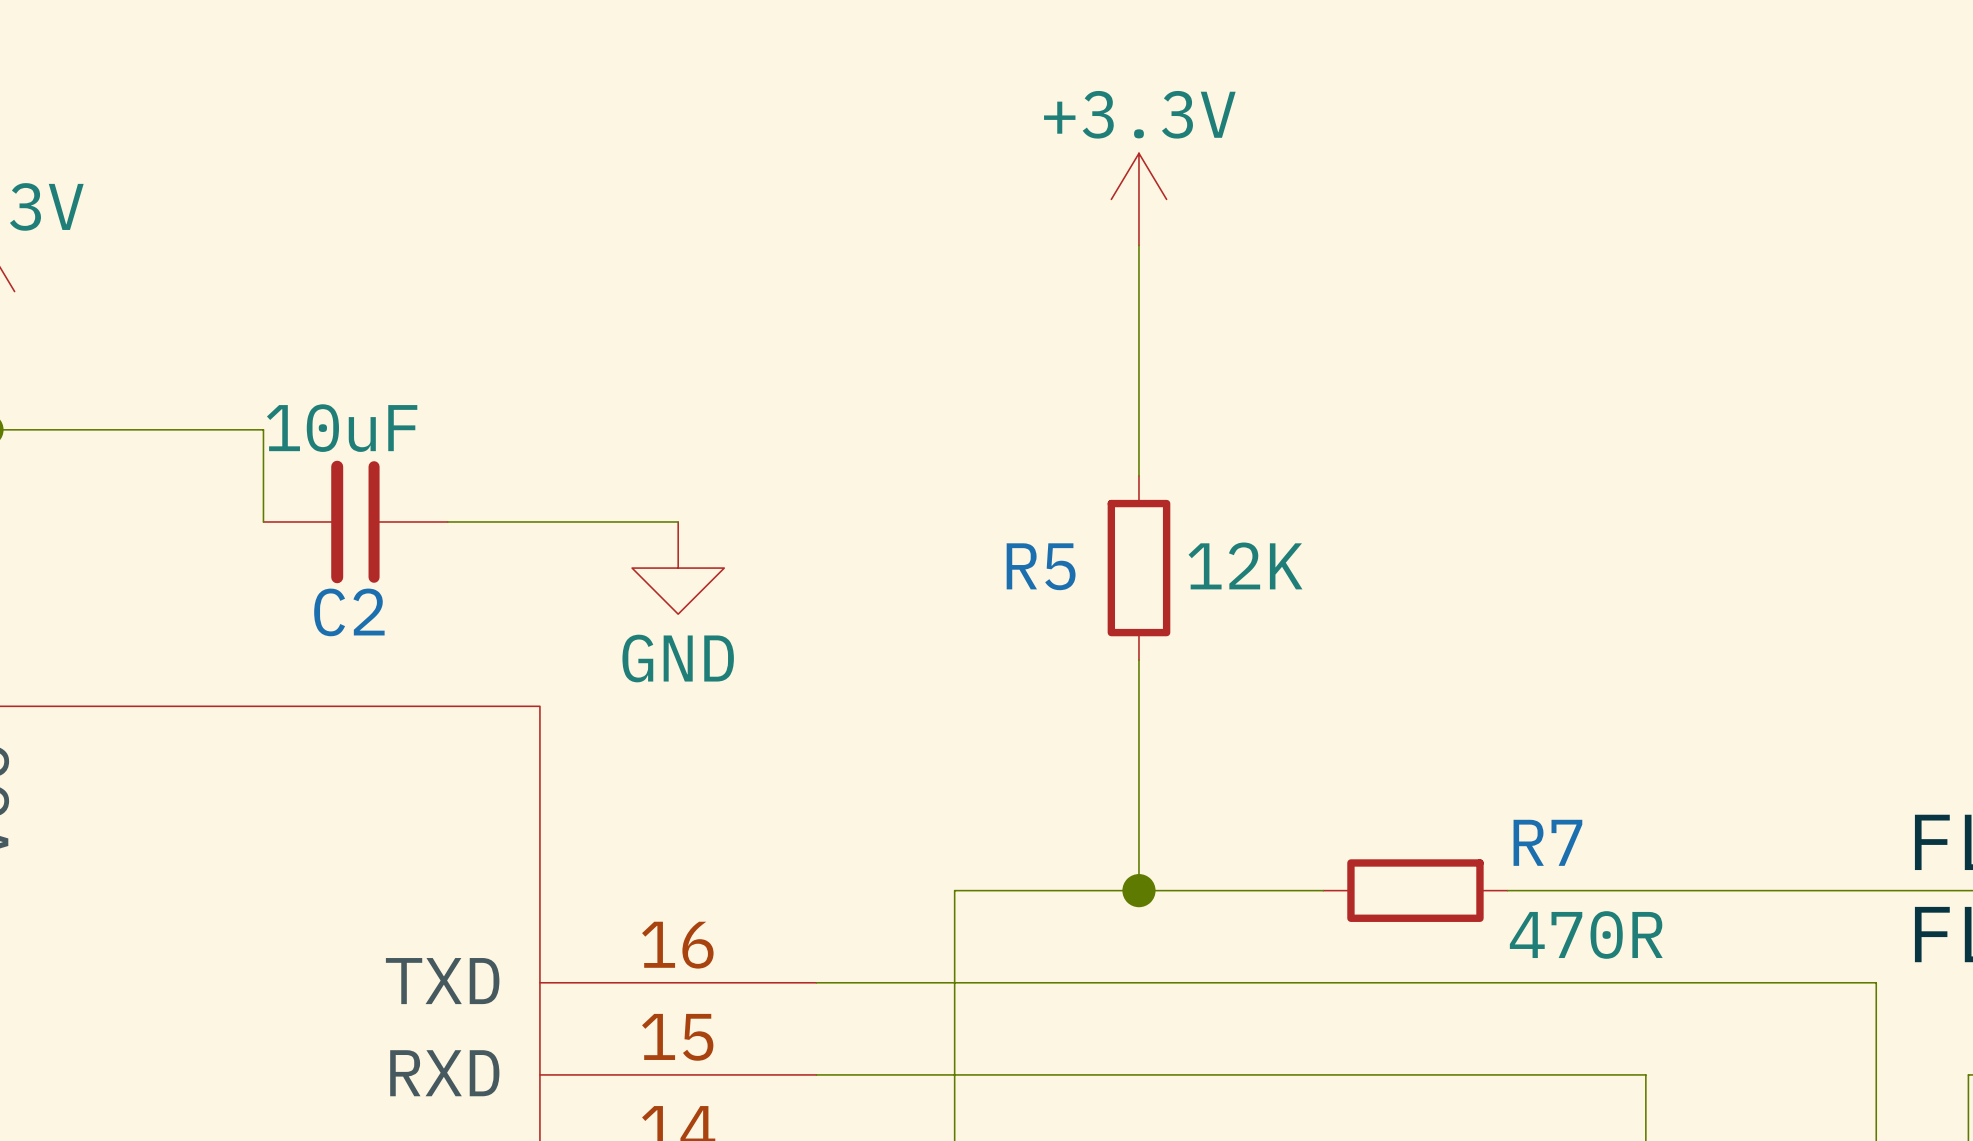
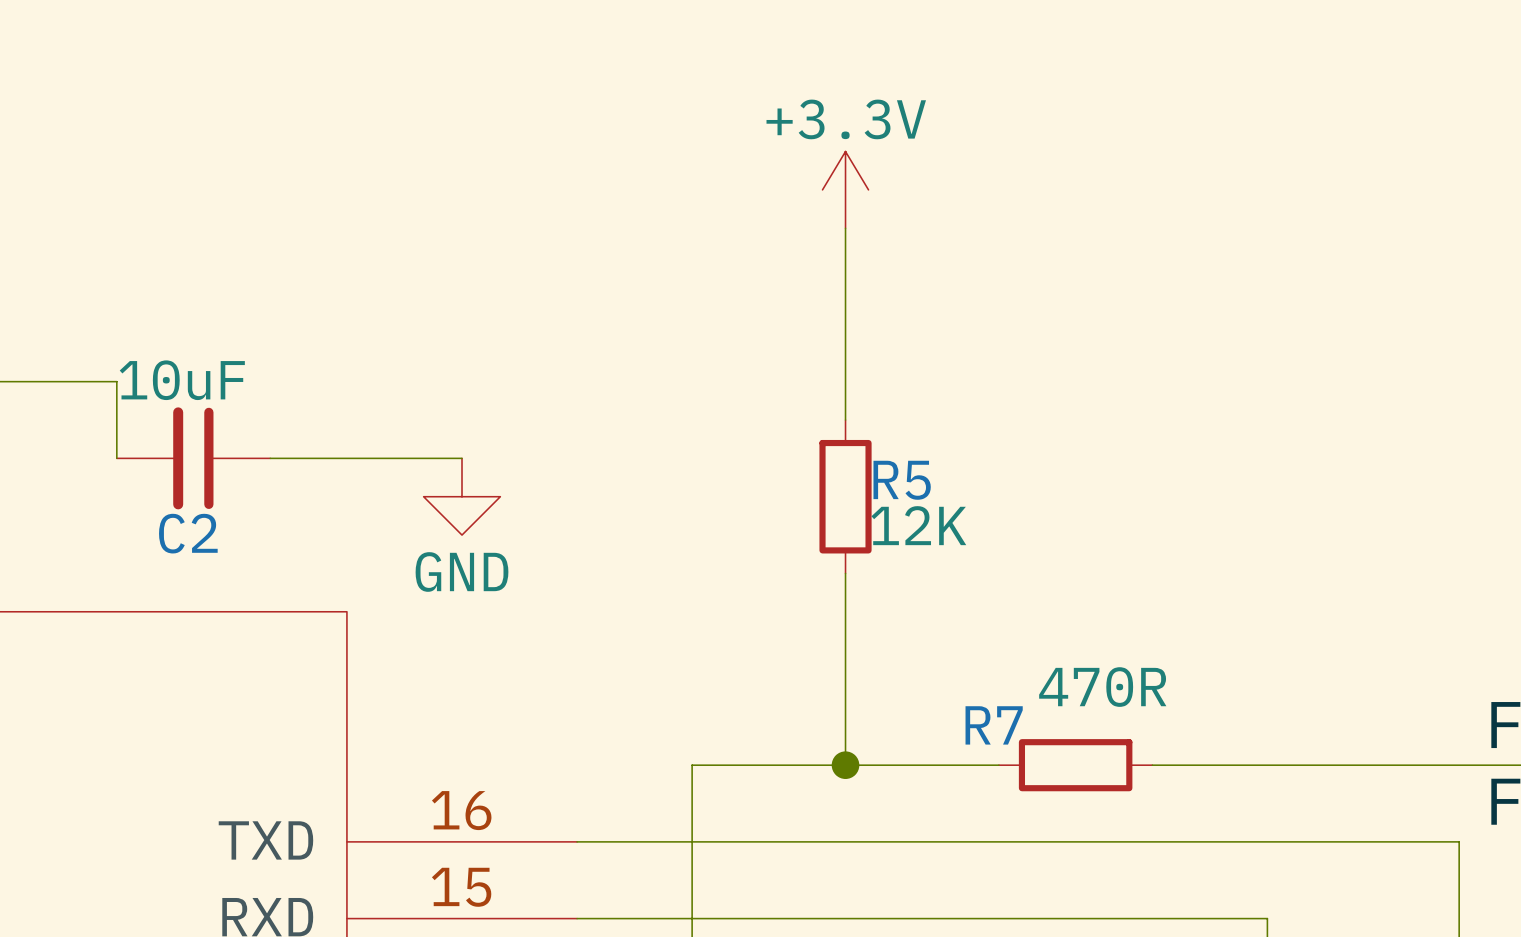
R5 value position: 12K (1245, 565) -> 12K (918, 525)
R5 name position: R5 (1041, 566) -> R5 (902, 480)
R7 name position: R7 (1547, 842) -> R7 (994, 725)
R7 value position: 470R (1586, 934) -> 470R (1102, 687)

